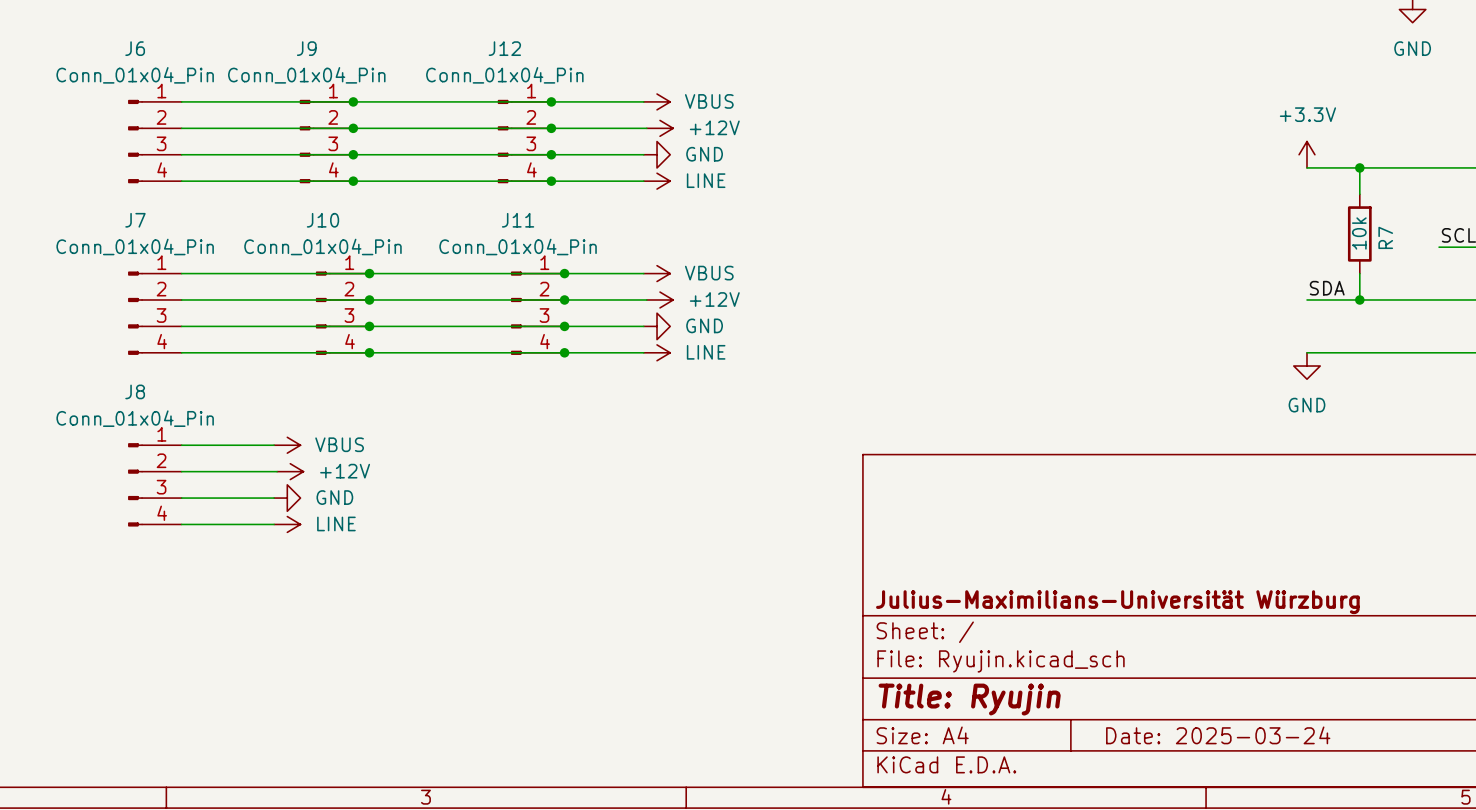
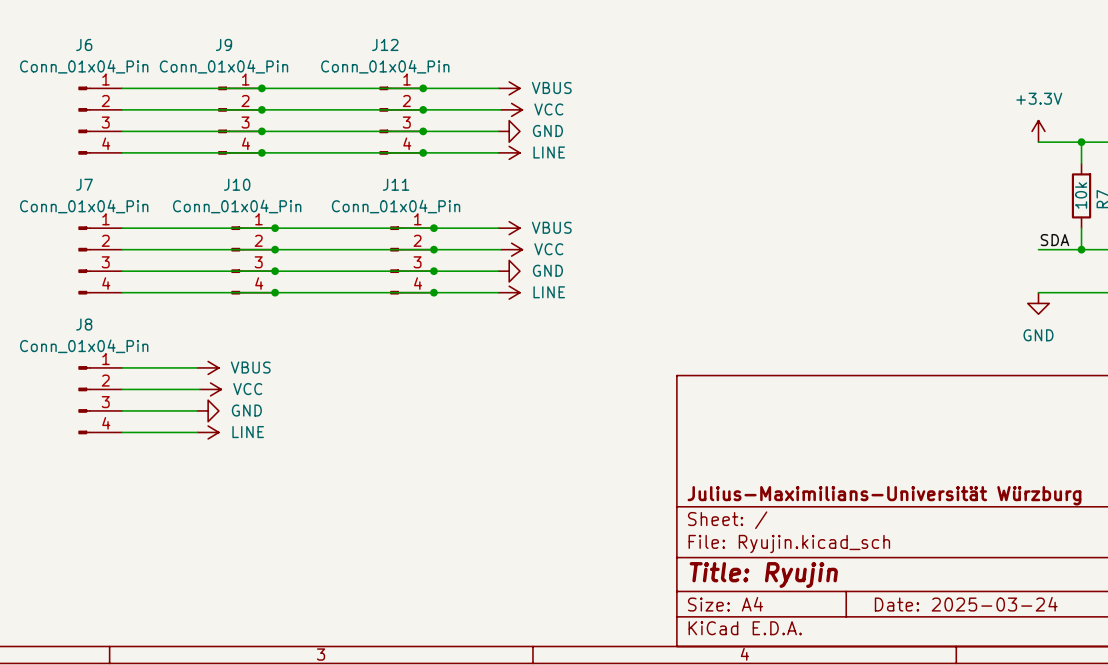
power symbol: +12V (660, 128) -> VCC (511, 109)
power symbol: +12V (660, 299) -> VCC (511, 249)
power symbol: +12V (290, 471) -> VCC (210, 389)

